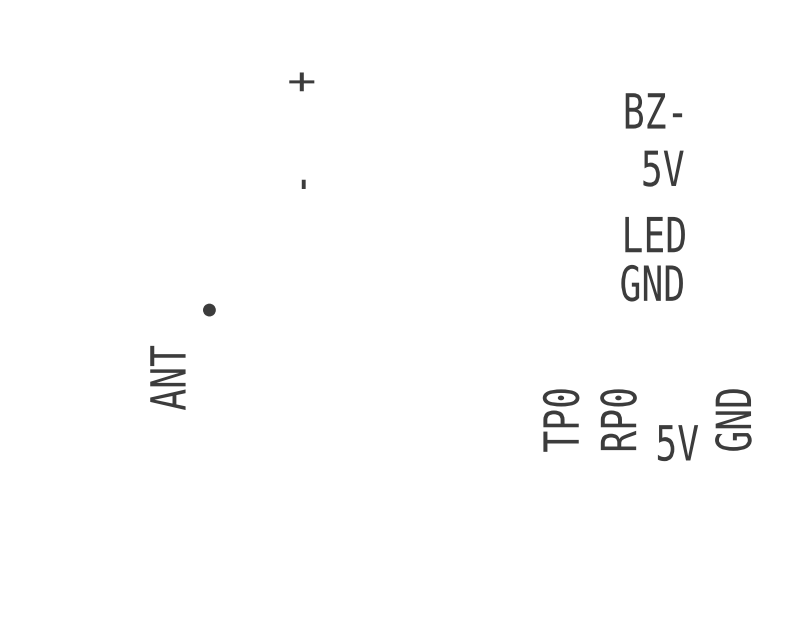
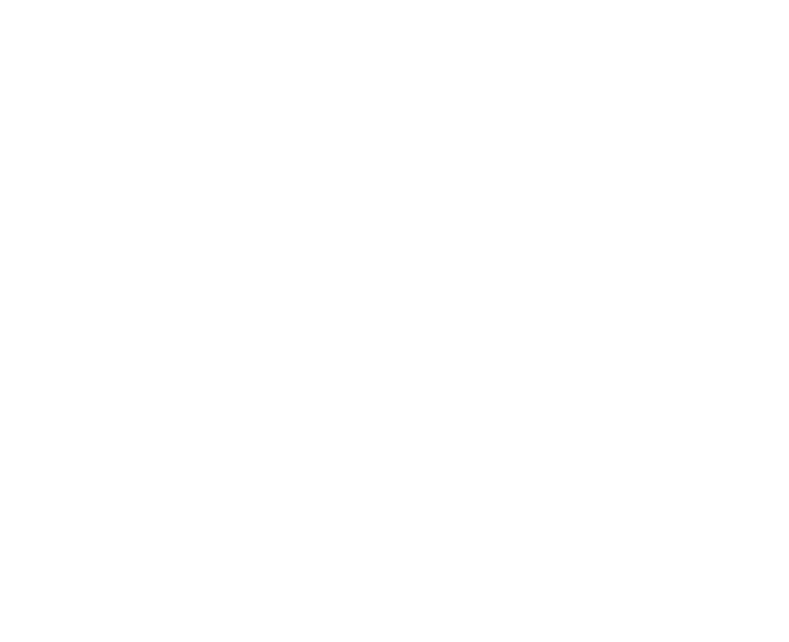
text: + (301, 81) -> none
text: BZ- (653, 110) -> none
text: 5V (663, 168) -> none
text: - (303, 184) -> none
text: LED (655, 234) -> none
text: GND (652, 283) -> none
drawing: [203, 303, 216, 317] -> none
text: ANT (167, 377) -> none
text: RP0 (618, 419) -> none
text: TP0 (561, 420) -> none
text: GND (733, 420) -> none
text: 5V (678, 443) -> none

